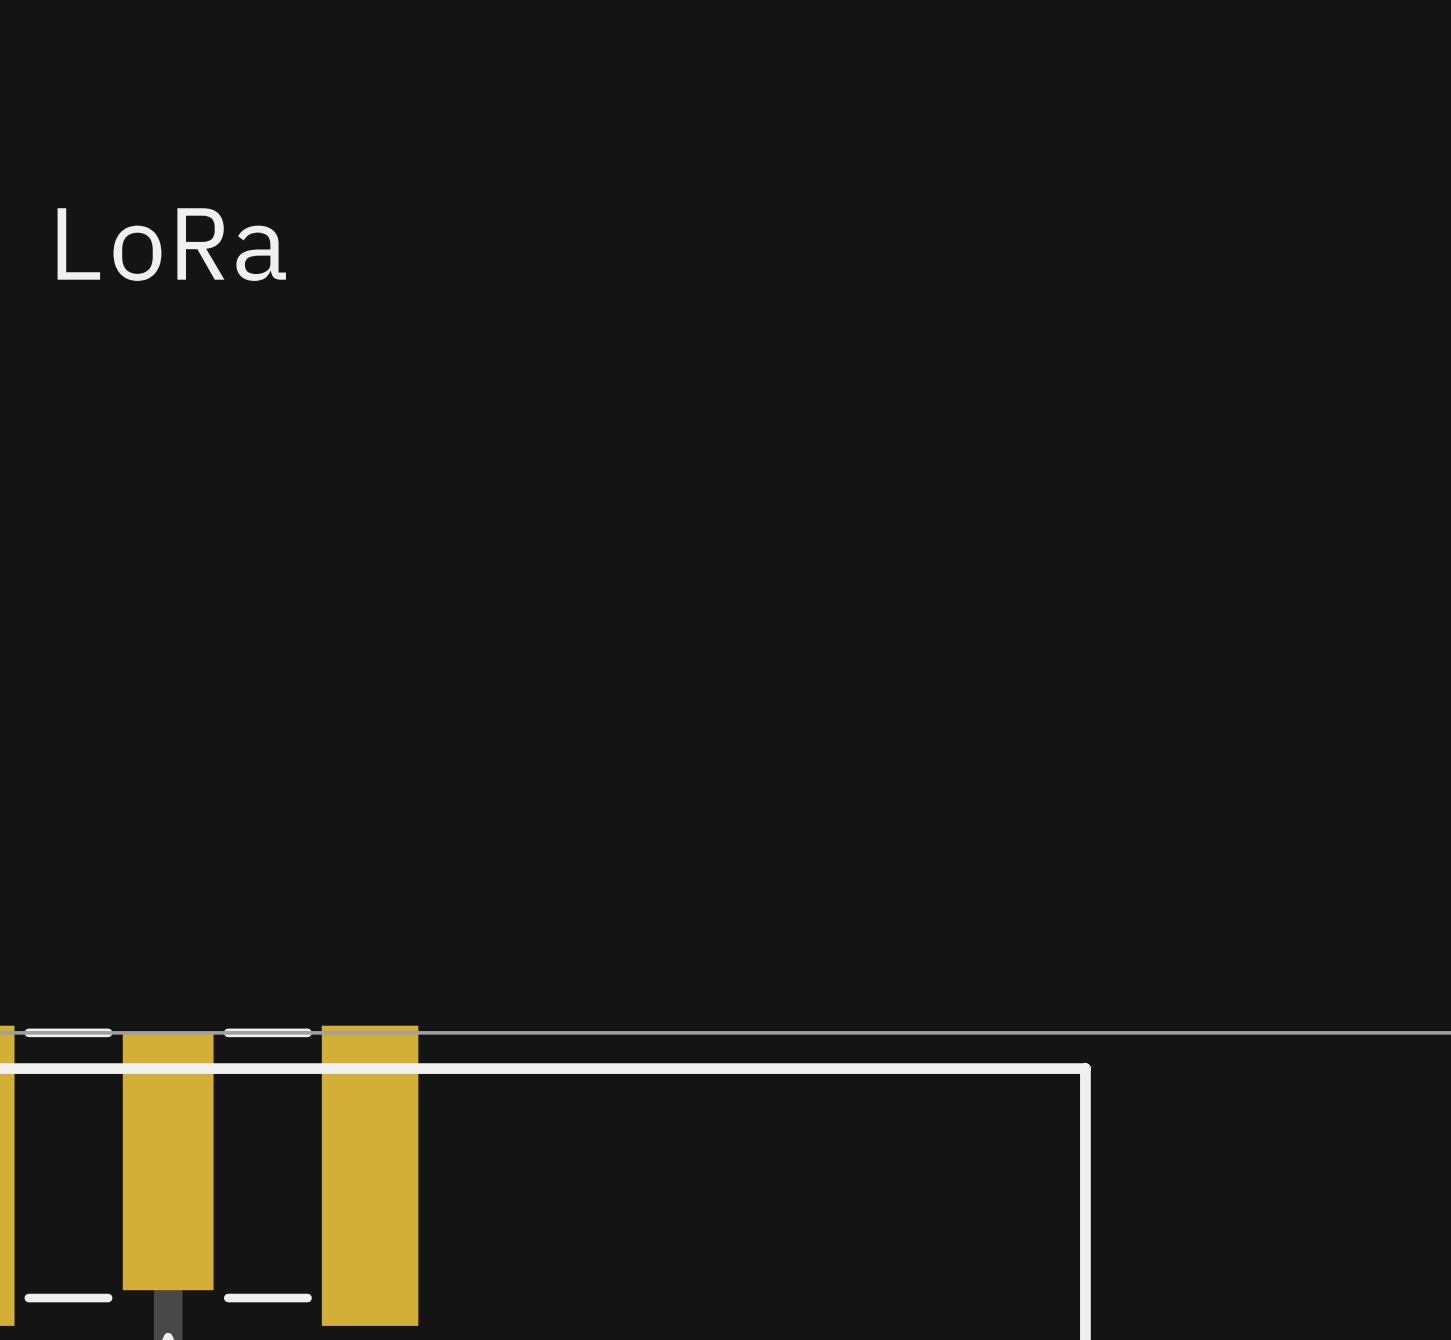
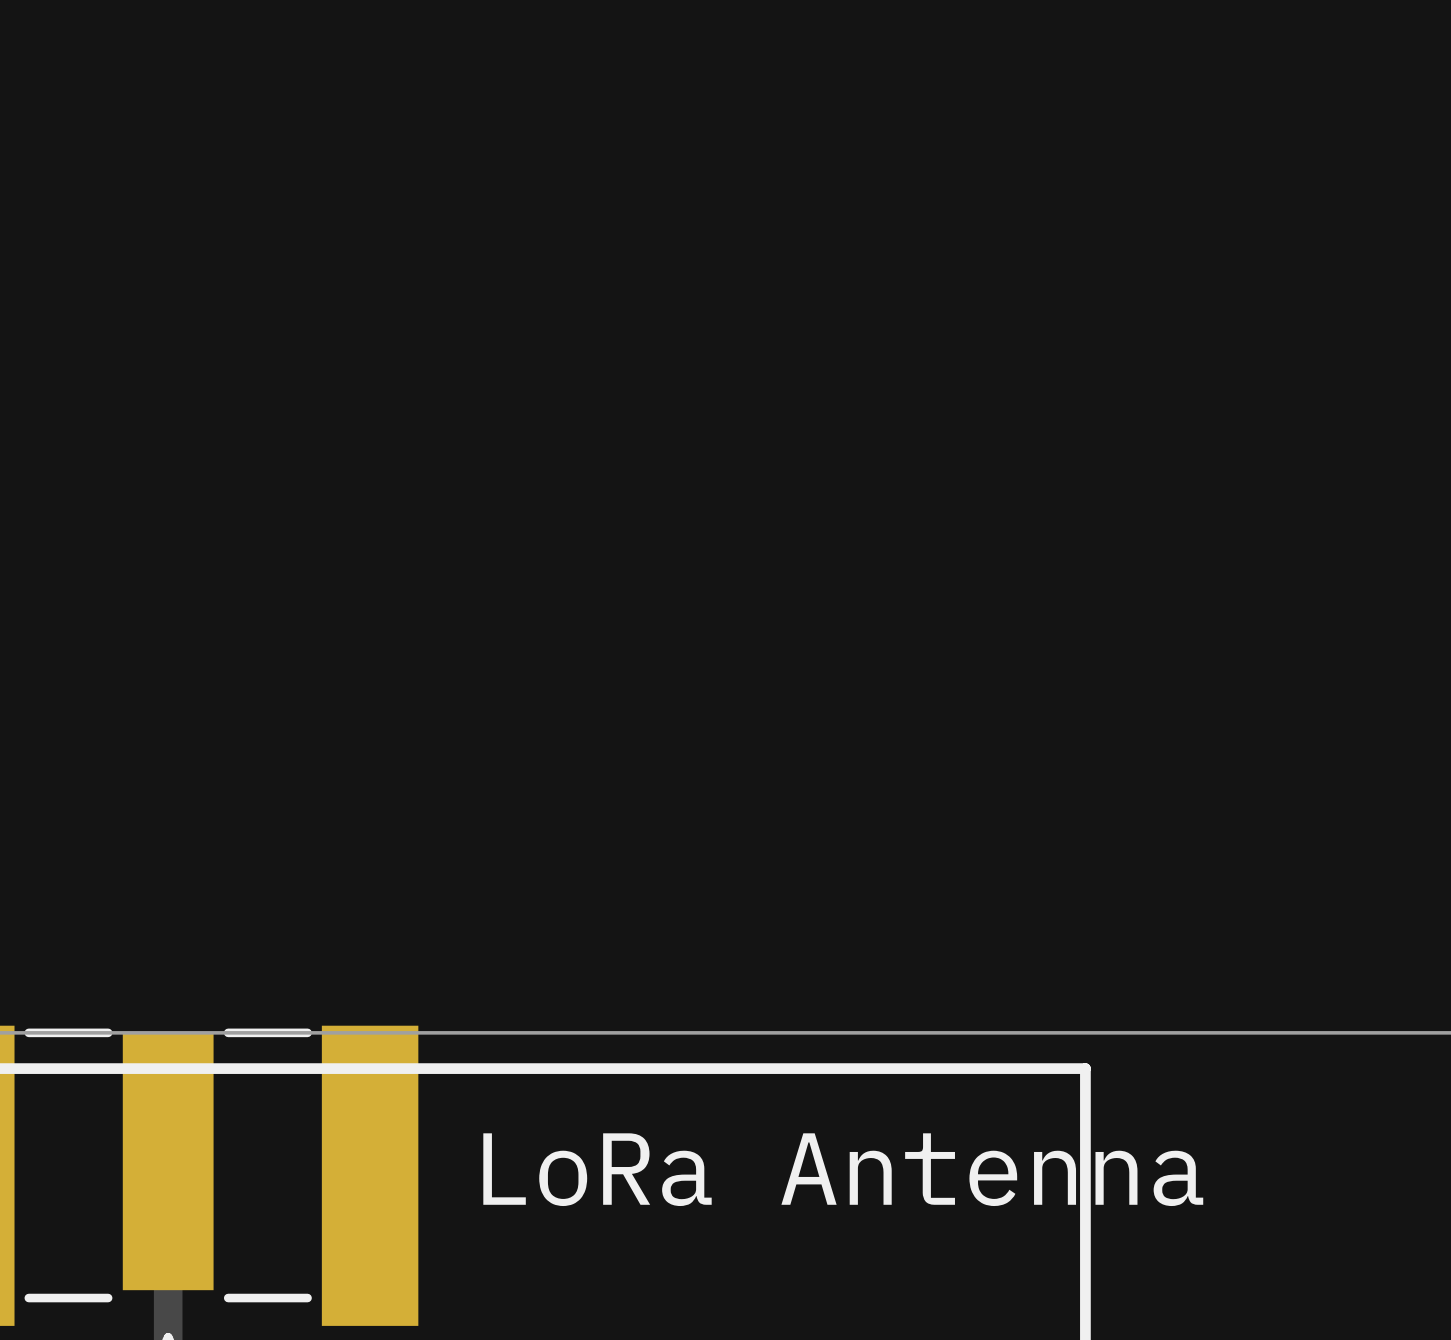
part value: LoRa (171, 244) -> LoRa Antenna (843, 1169)

